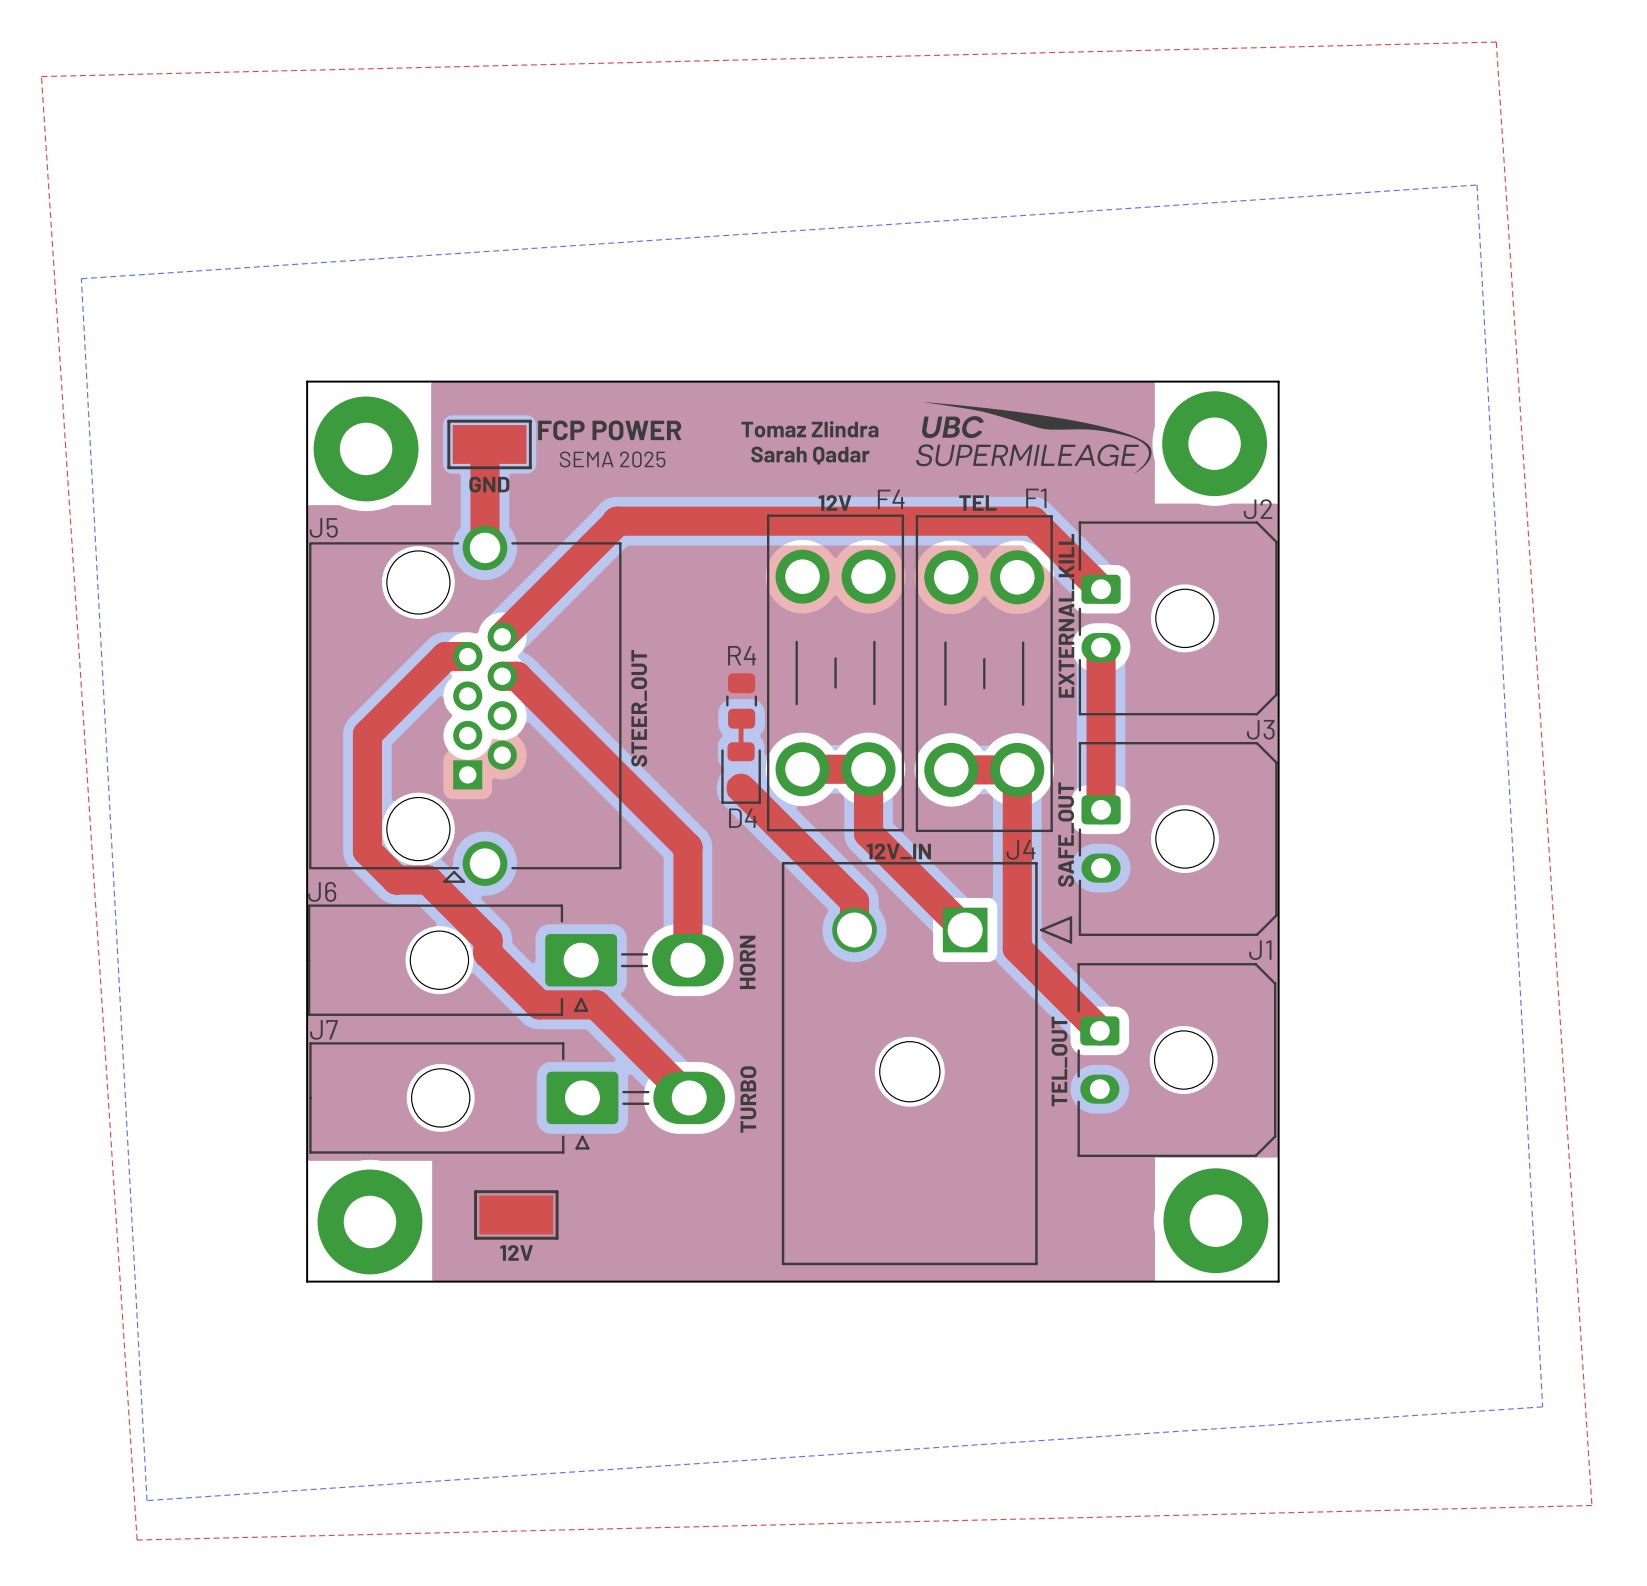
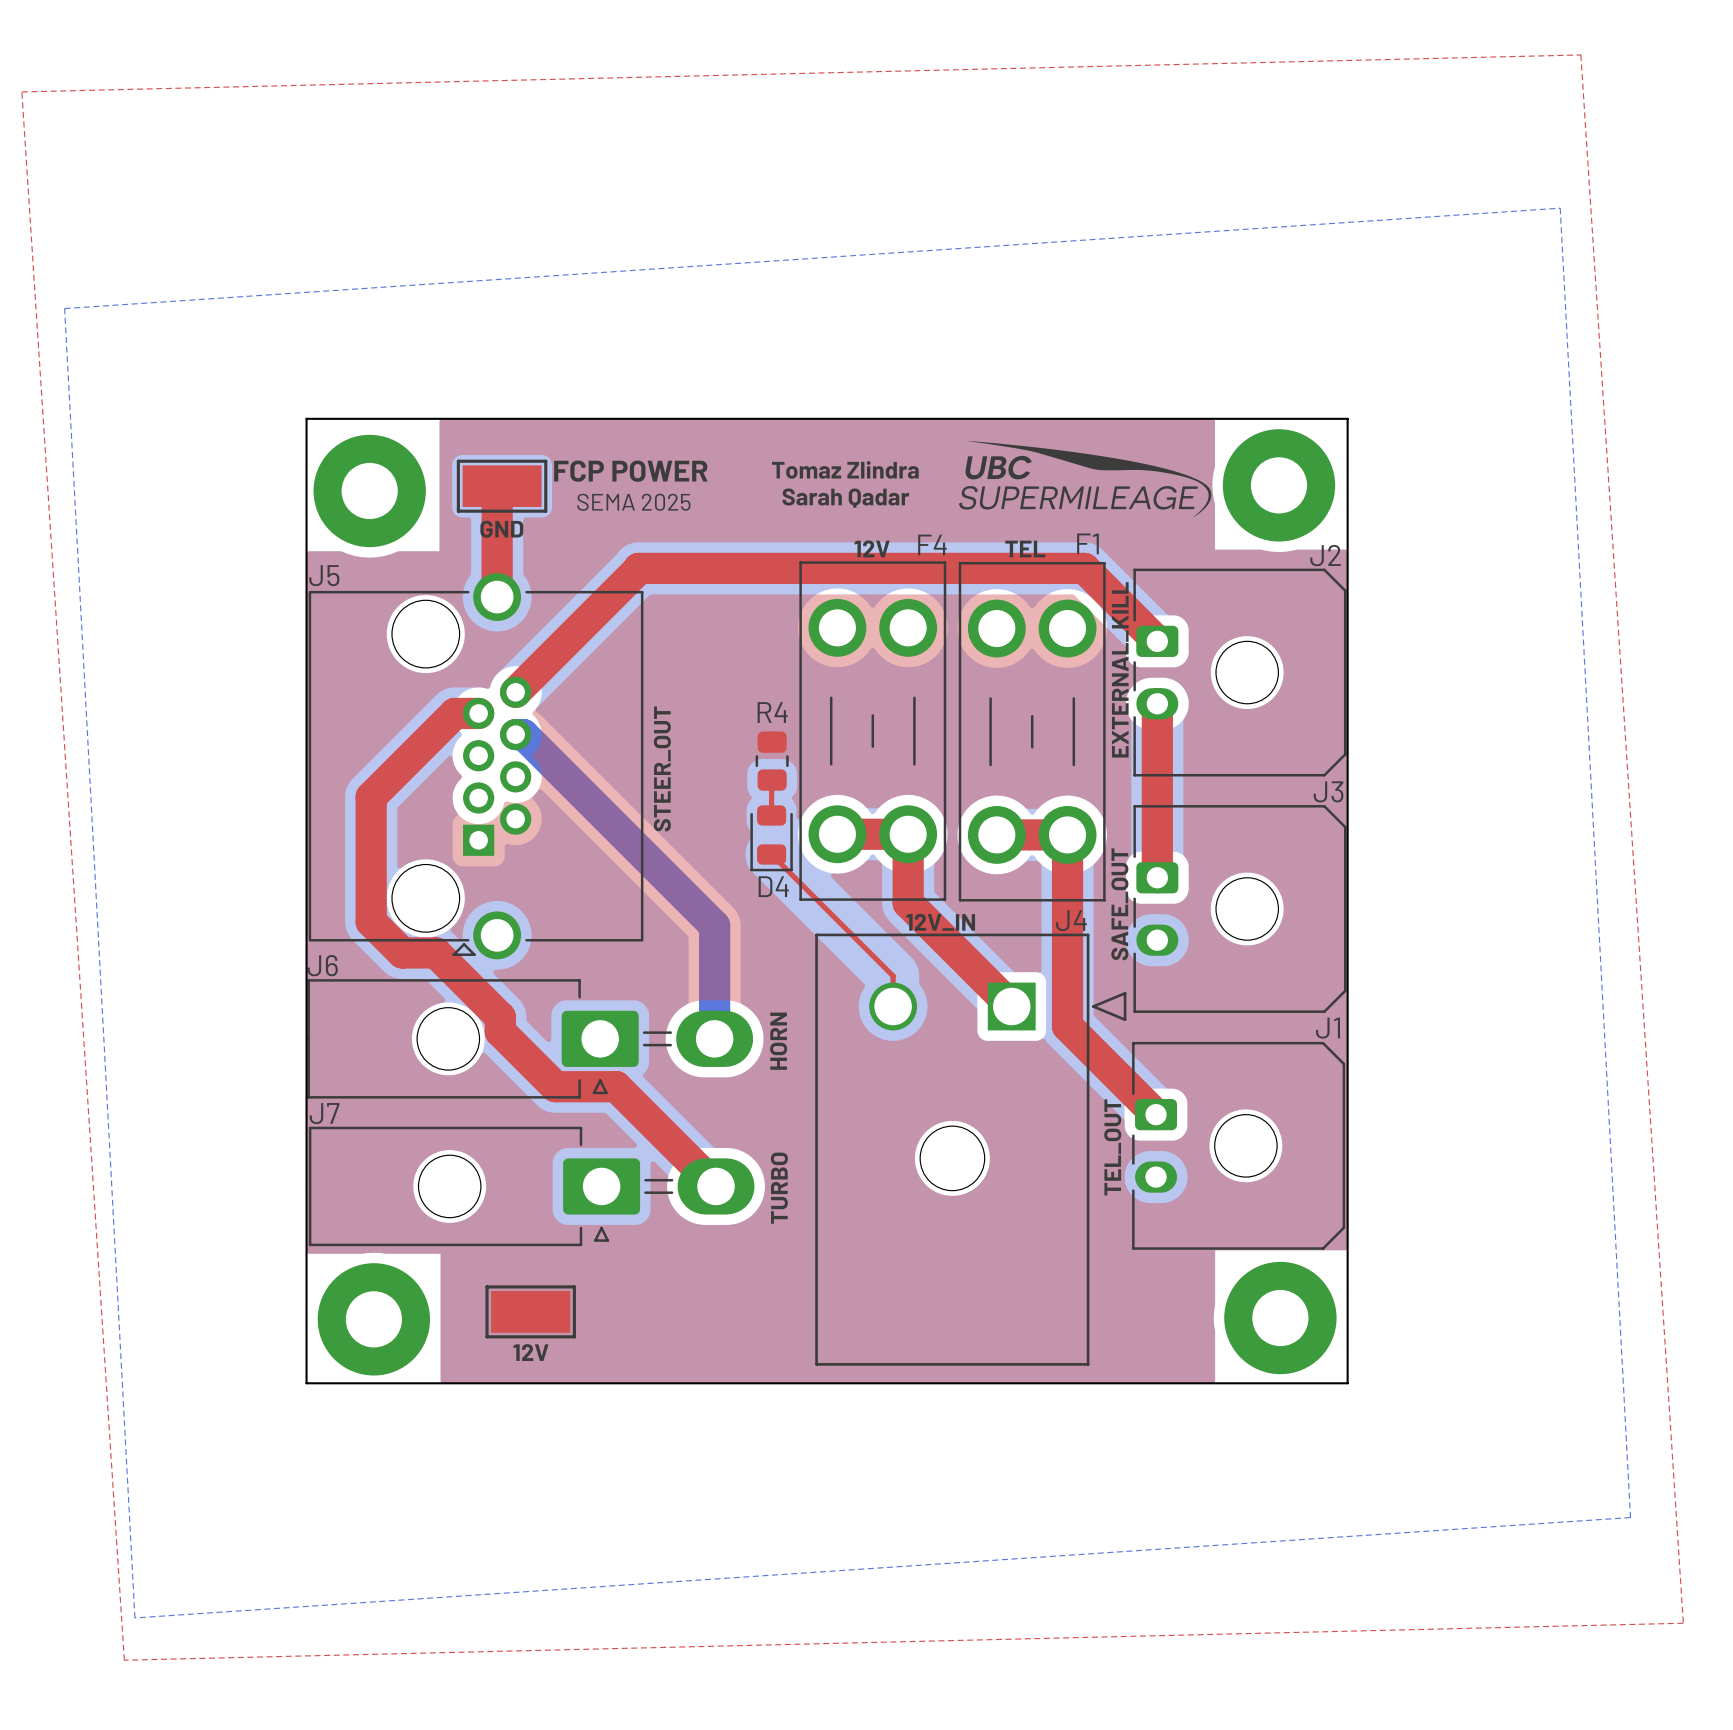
top track: (502, 676) (516, 676) (687, 847) (687, 960) -> none
bottom track: none -> (515, 734) (523, 734) (714, 925) (714, 1038)
top track width: thick (741, 788) (854, 901) (854, 930) -> thin (771, 854) (893, 976) (893, 1006)

